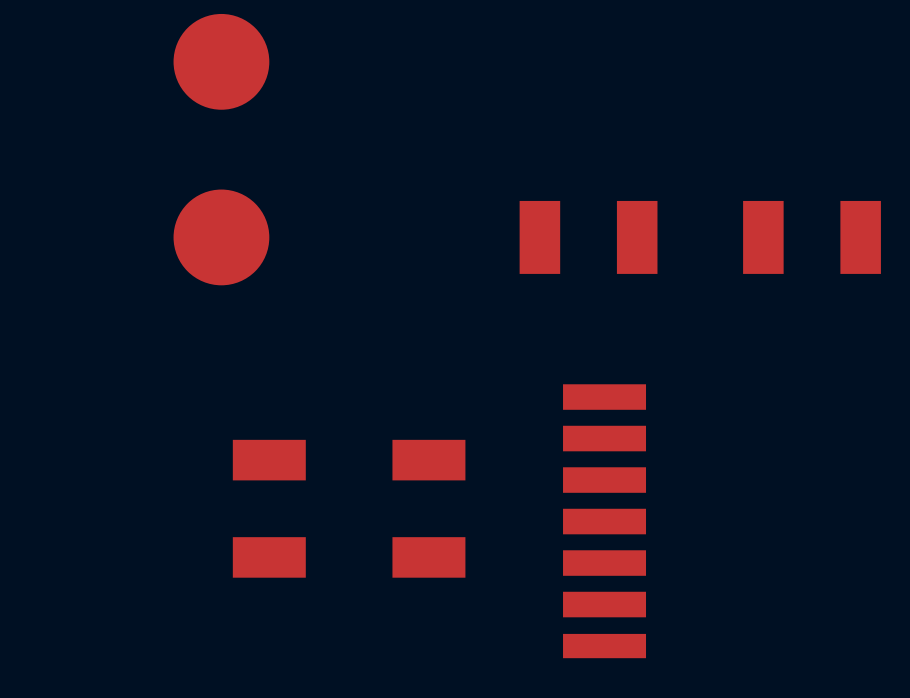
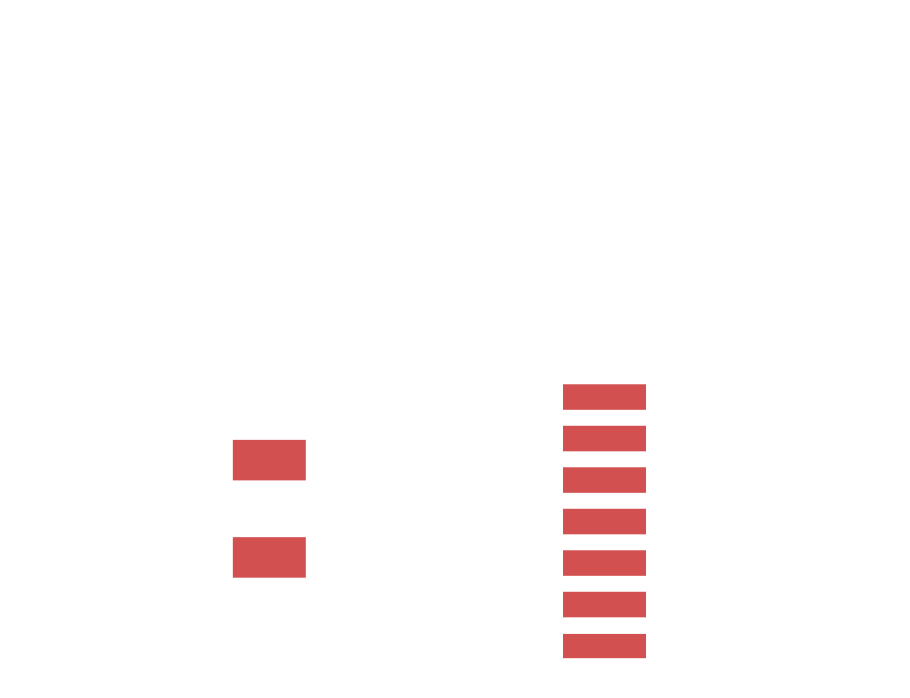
part: (221, 61) -> none
part: (221, 237) -> none
part: (588, 237) -> none
part: (812, 237) -> none
part: (428, 508) -> none

